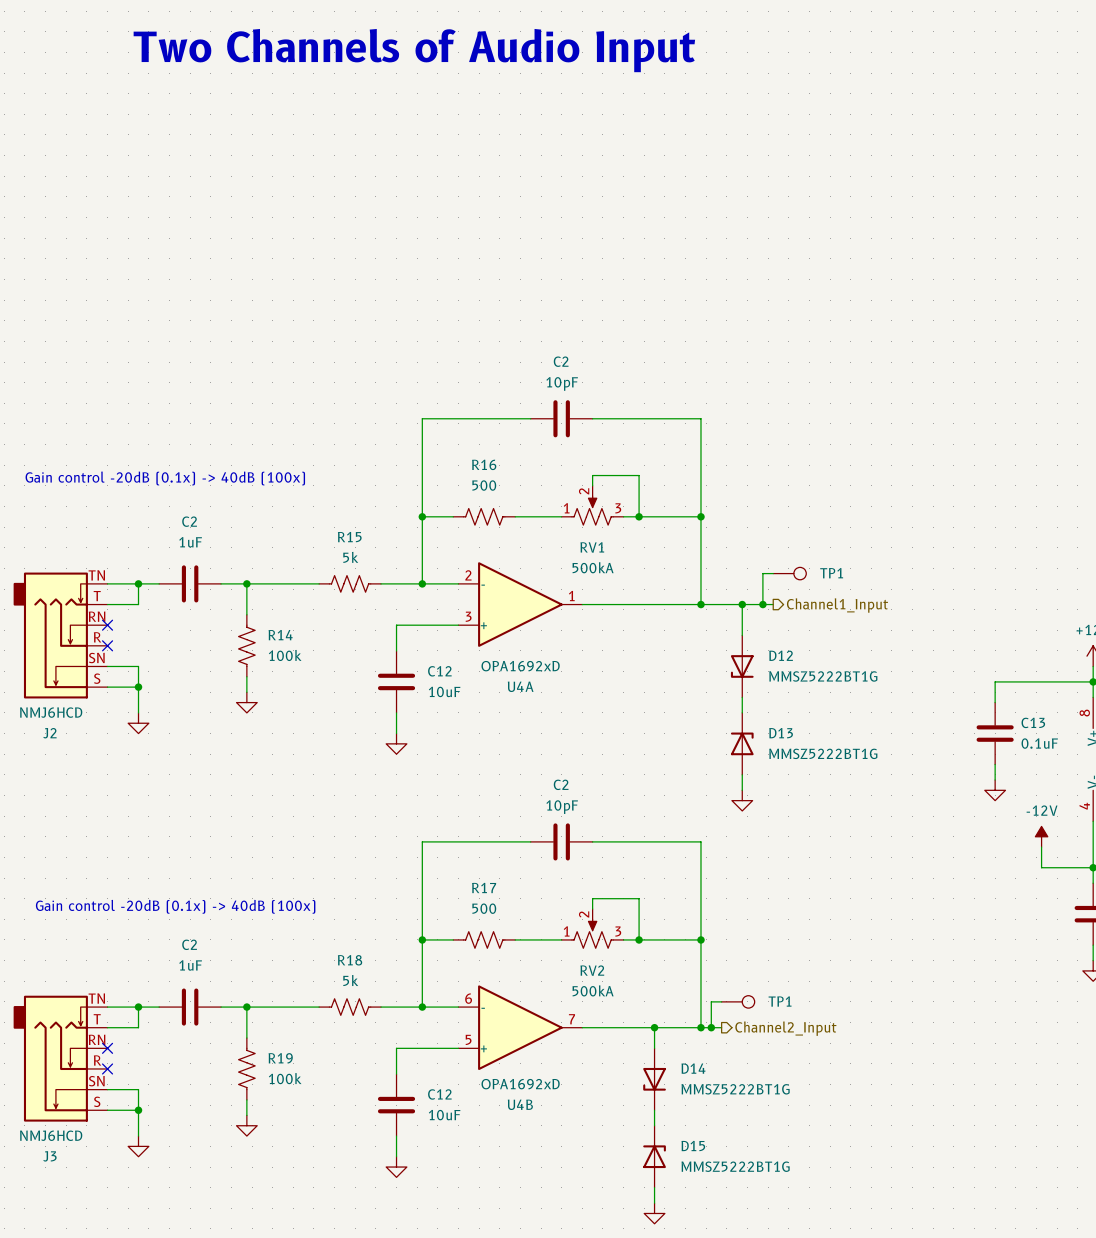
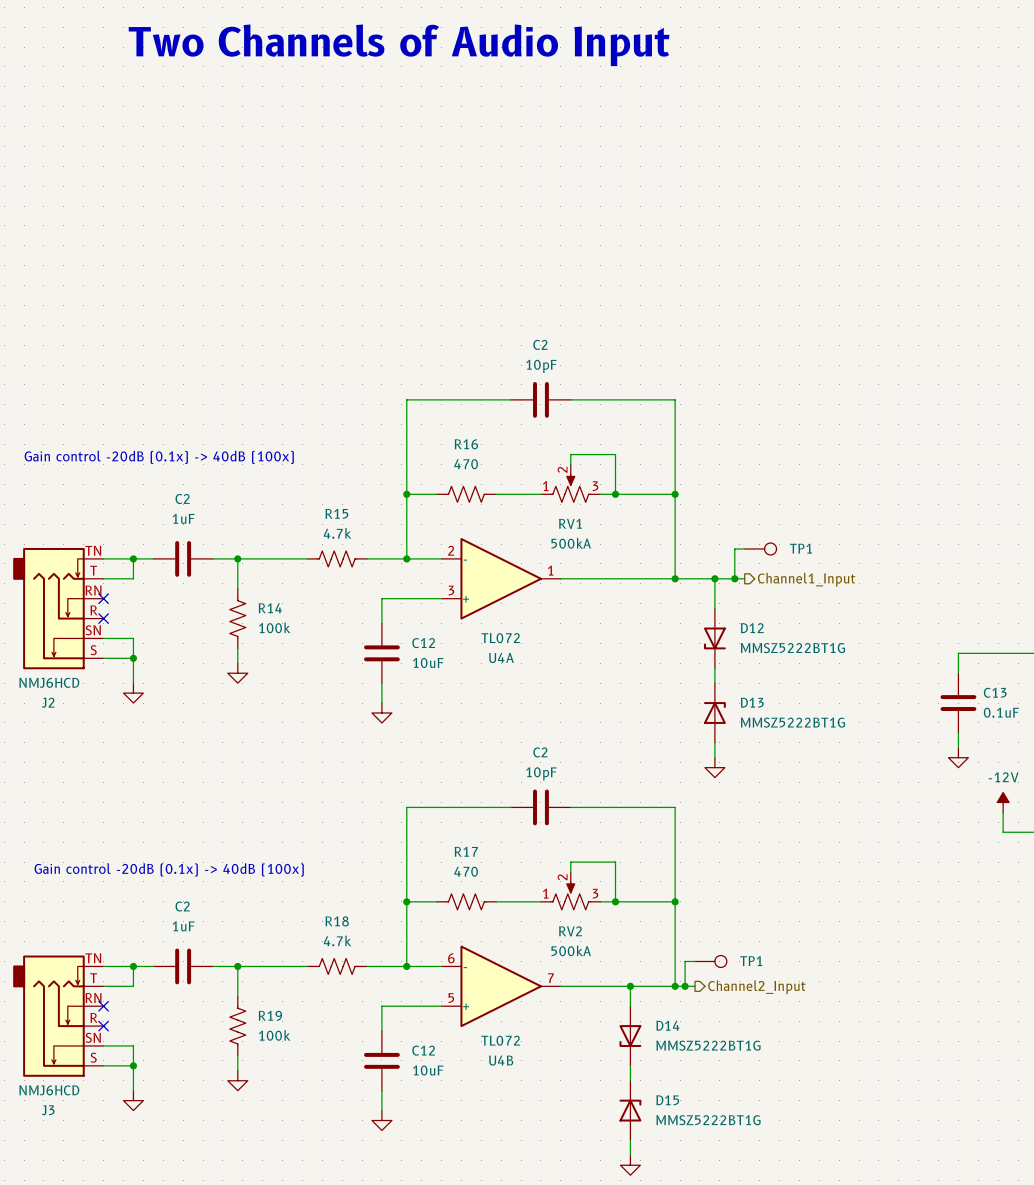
R16 value: 500 (484, 485) -> 470 (466, 464)
R15 value: 5k (350, 557) -> 4.7k (337, 533)
U4A value: OPA1692xD (520, 666) -> TL072 (500, 638)
R17 value: 500 (484, 908) -> 470 (466, 871)
R18 value: 5k (350, 980) -> 4.7k (337, 940)
U4B value: OPA1692xD (520, 1084) -> TL072 (500, 1040)

